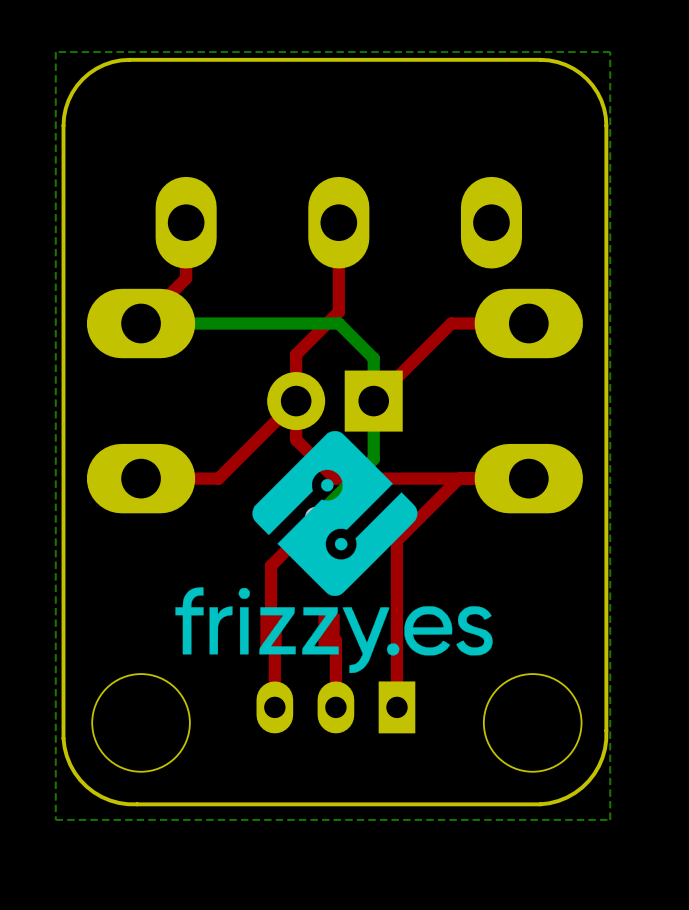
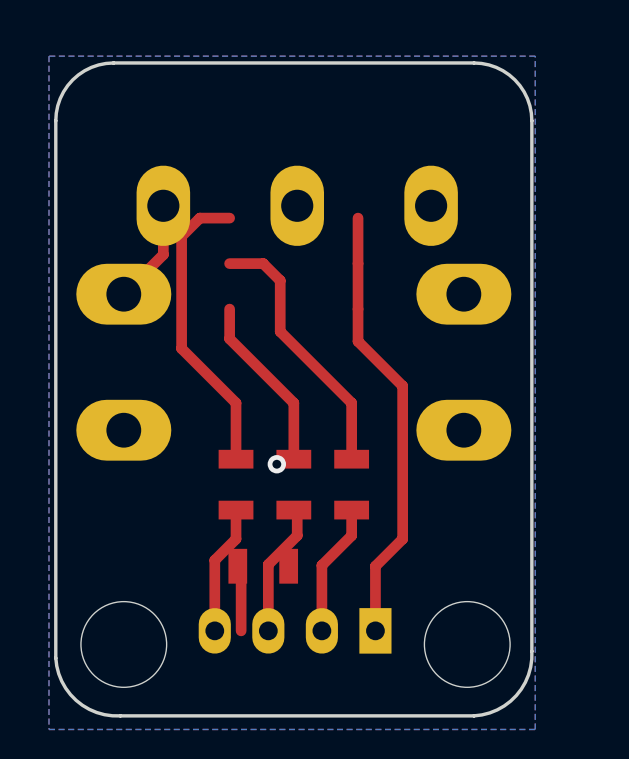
top track: (338, 222) (338, 311) (296, 354) (296, 439) (334, 478) (528, 478) (509, 478) -> none
top track: none -> (229, 218) (199, 218) (181, 236) (181, 348) (236, 403) (236, 459)
top track: none -> (358, 218) (358, 341) (402, 386) (402, 539) (375, 566) (375, 630)
top track: none -> (229, 263) (263, 263) (280, 280) (280, 331) (351, 403) (351, 459)
bottom track: (141, 323) (338, 323) (373, 358) (373, 459) (315, 517) -> none
top track: (528, 323) (451, 323) (373, 401) -> none
top track: none -> (229, 309) (229, 338) (293, 403) (293, 459)
top track: (296, 401) (218, 478) (141, 478) -> none
part: (334, 401) -> none
drawing: [175, 431, 493, 674] -> none
top track: (459, 478) (396, 540) (396, 707) -> none
top track: (315, 517) (315, 521) (271, 565) (271, 633) -> none
part: none -> (236, 484)
part: none -> (293, 484)
part: none -> (351, 484)
top track: none -> (236, 510) (236, 539) (214, 560) (214, 630)
top track: none -> (293, 510) (297, 513) (297, 535) (268, 564) (268, 630)
top track: none -> (351, 510) (351, 535) (321, 565) (321, 630)
top track: (335, 640) (335, 707) -> none
part footprint: [256, 681, 416, 734] -> [198, 608, 392, 654]

